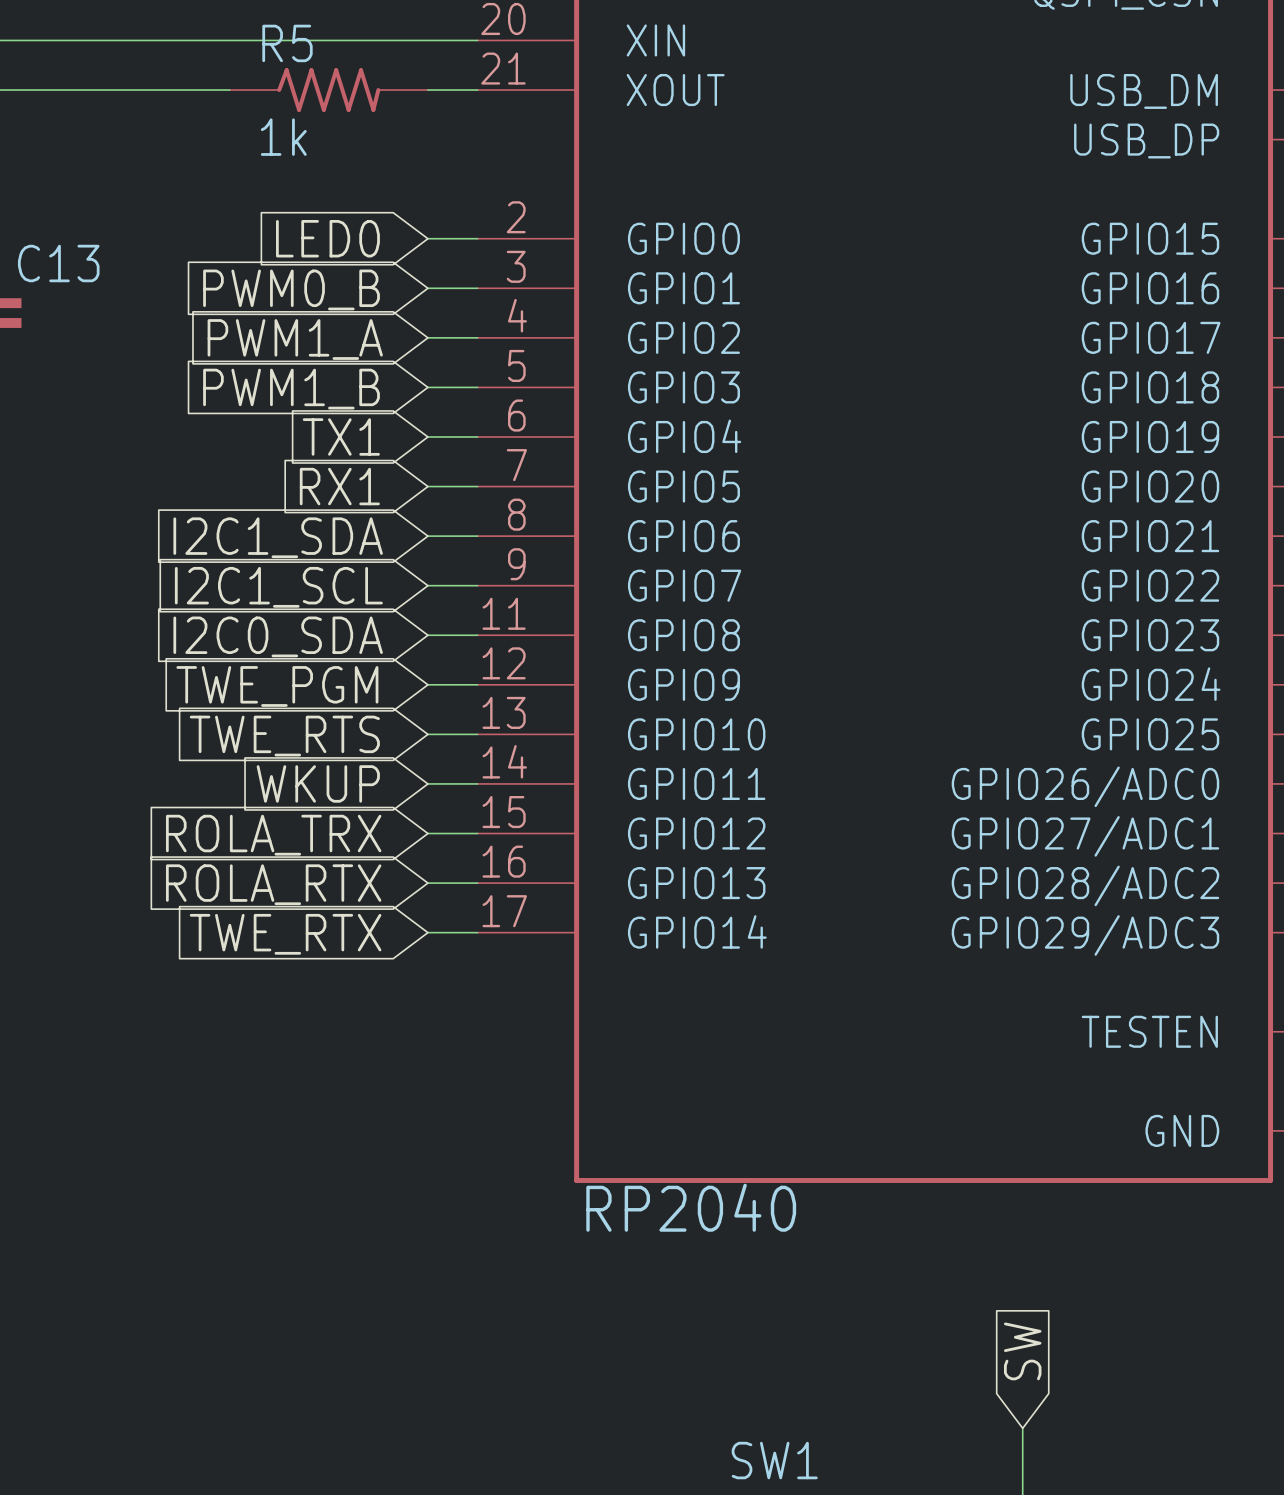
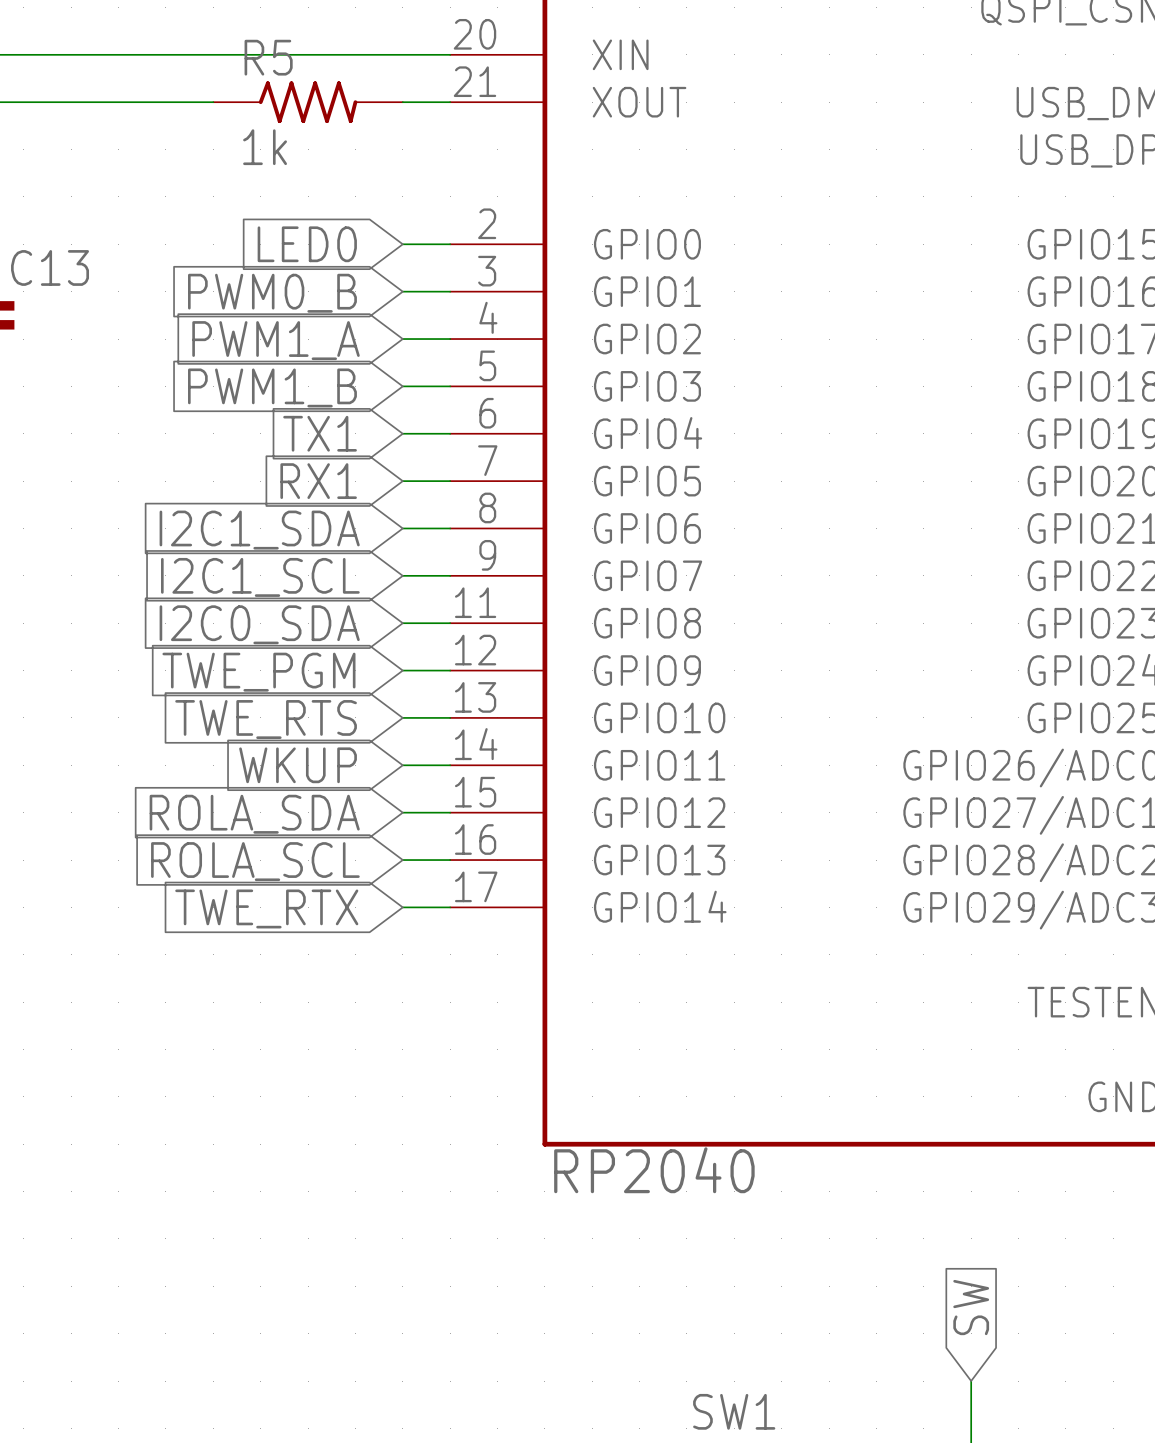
global label: ROLA_TRX (273, 835) -> ROLA_SDA (254, 814)
global label: ROLA_RTX (273, 884) -> ROLA_SCL (255, 861)

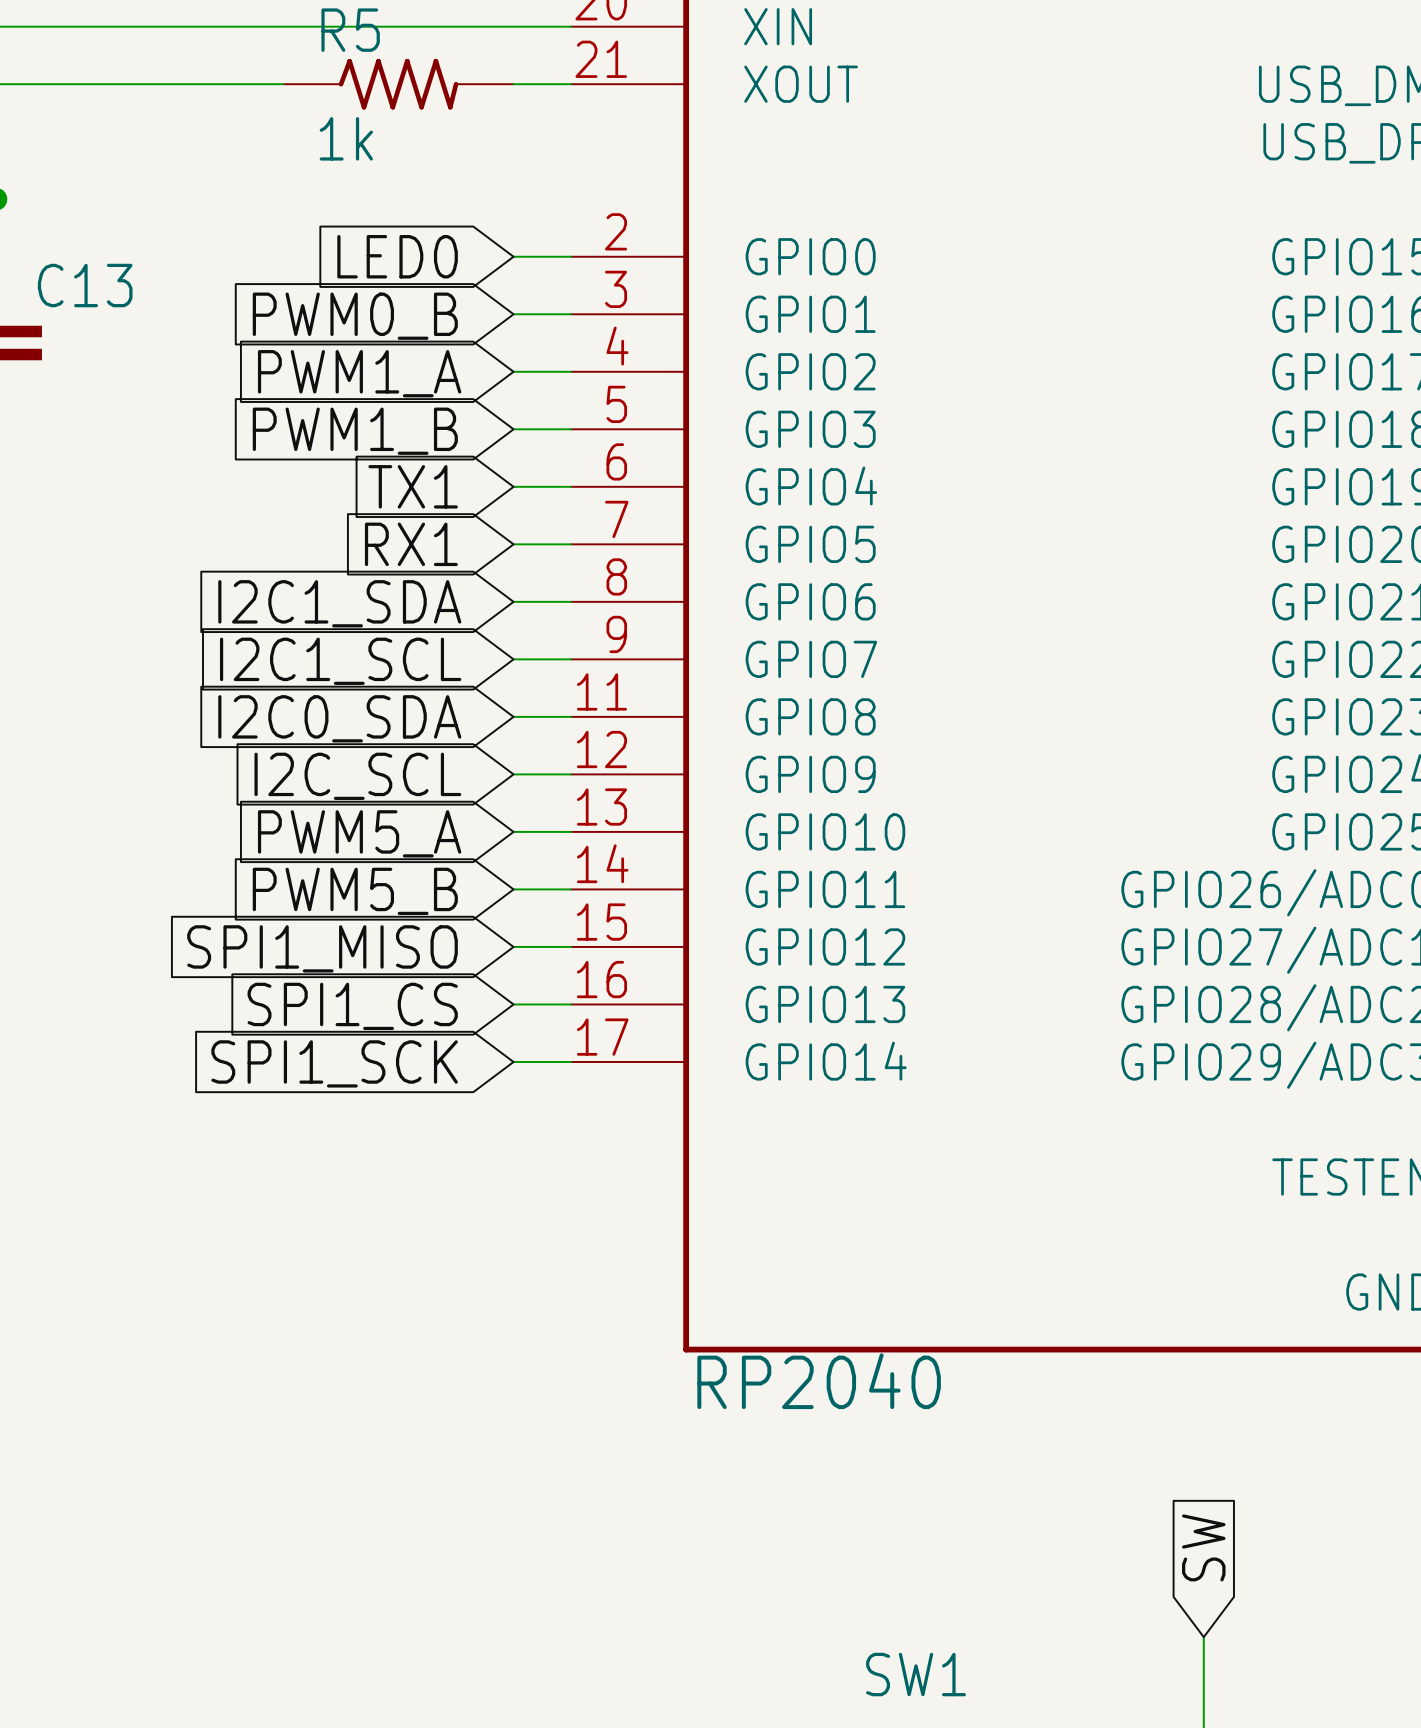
global label: TWE_PGM (258, 672) -> I2C_SCL (357, 776)
global label: TWE_RTS (266, 719) -> PWM5_A (359, 833)
global label: WKUP (298, 765) -> PWM5_B (355, 891)
global label: ROLA_SDA (254, 814) -> SPI1_MISO (322, 948)
global label: ROLA_SCL (255, 861) -> SPI1_CS (352, 1006)
global label: TWE_RTX (266, 908) -> SPI1_SCK (334, 1063)

